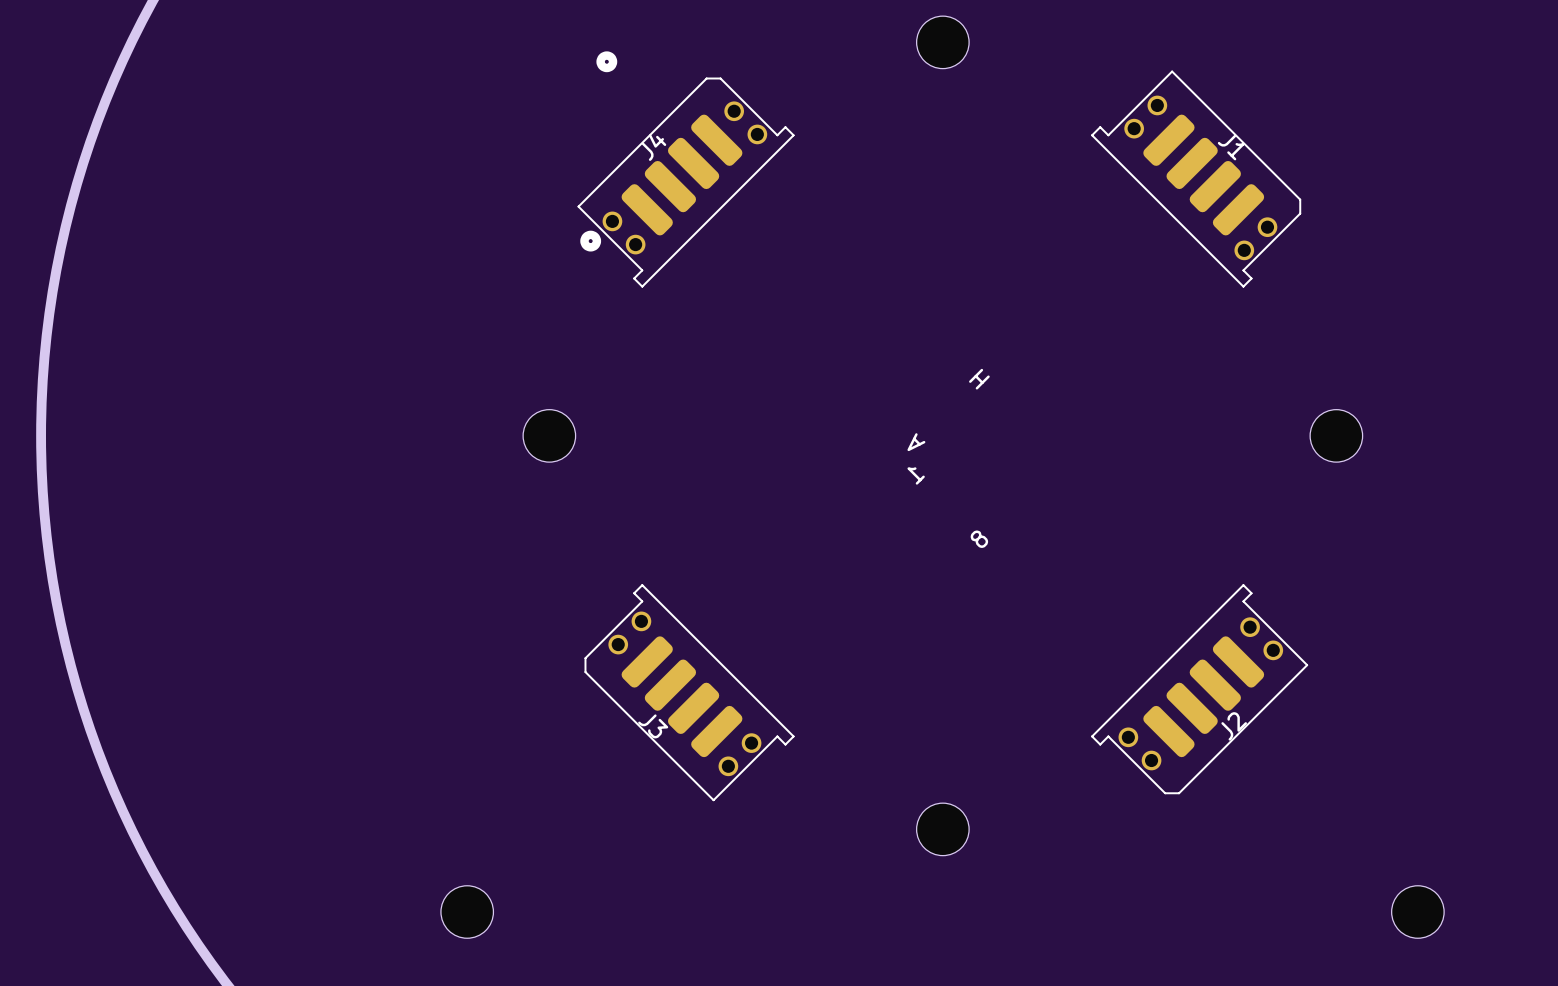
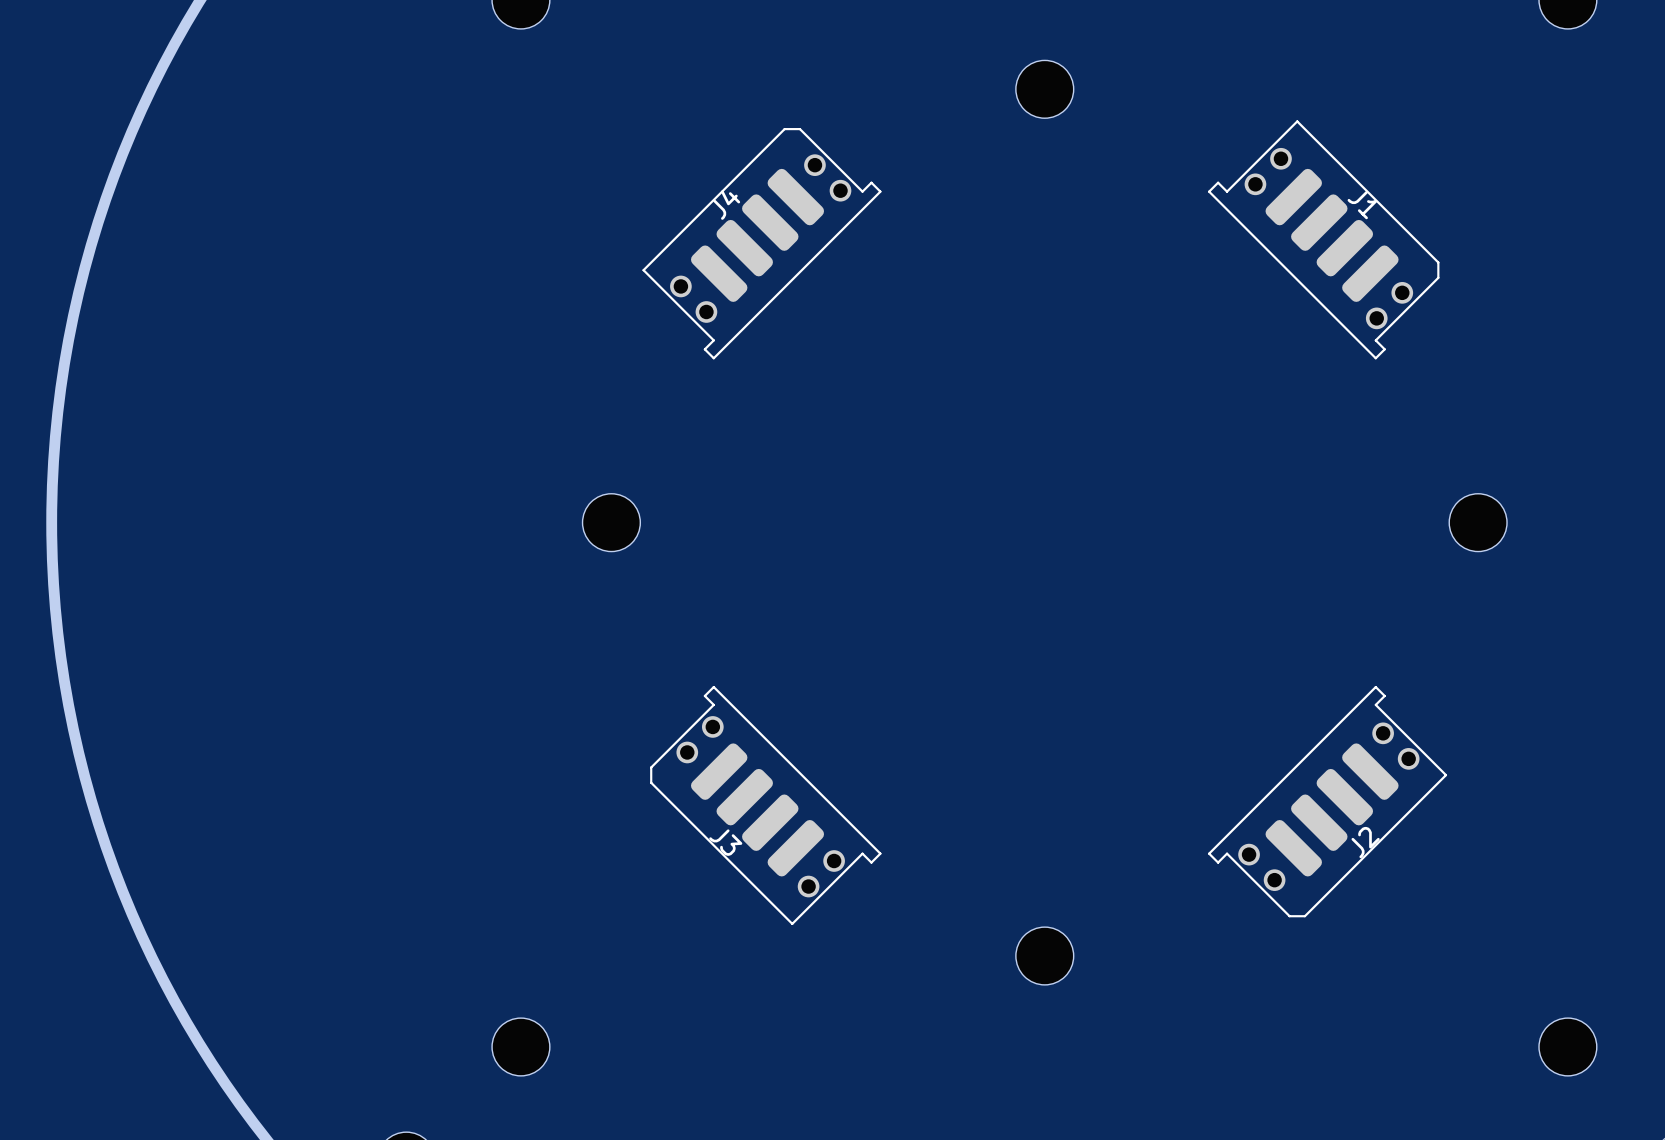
part: (606, 61) -> none
part: (590, 241) -> none
part: (948, 458) -> none

